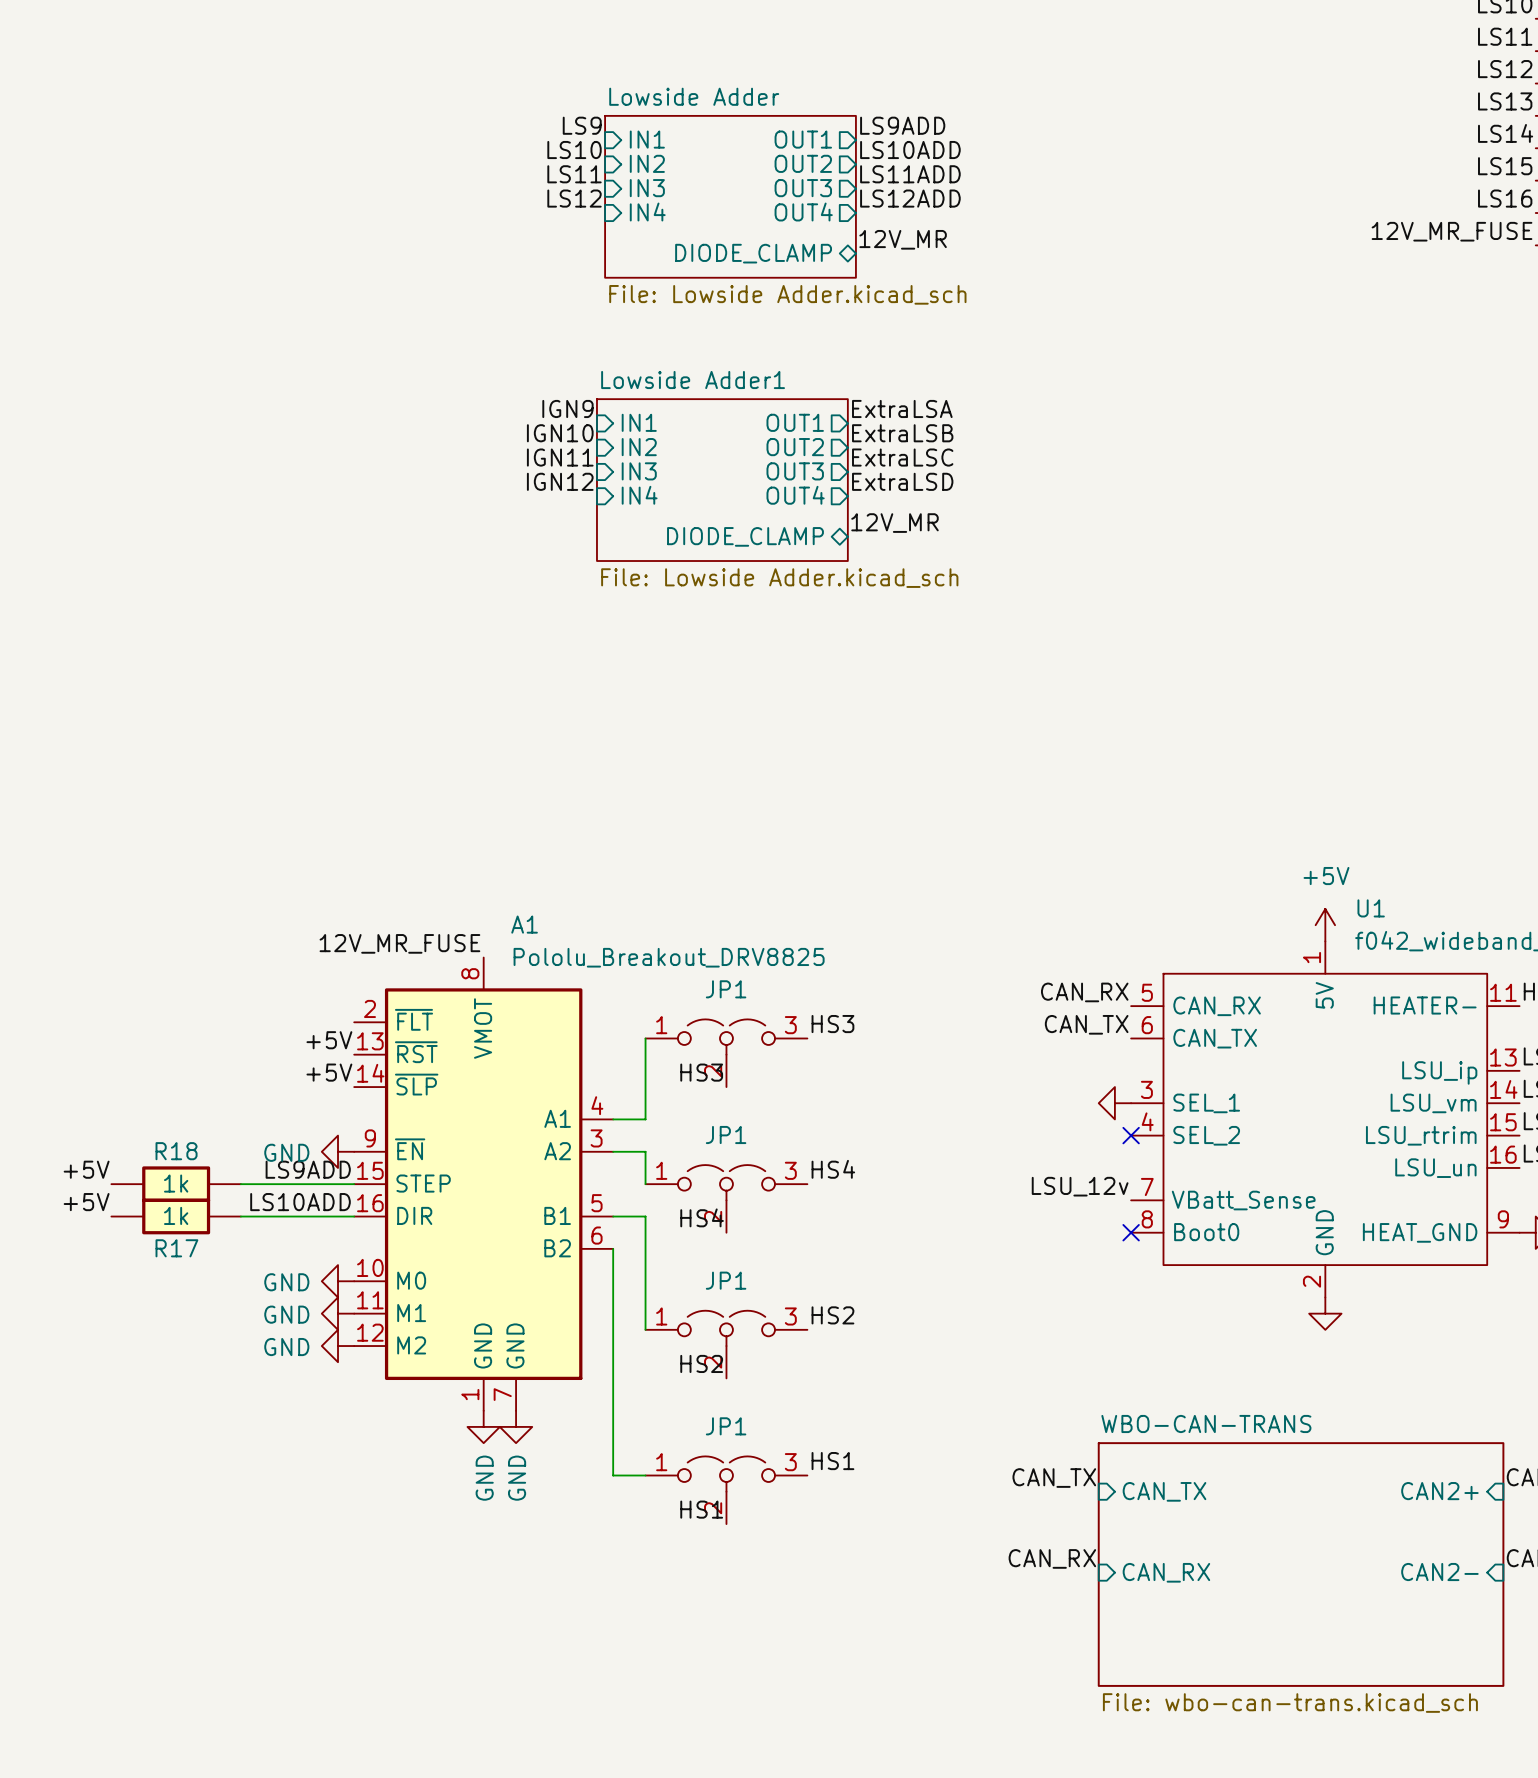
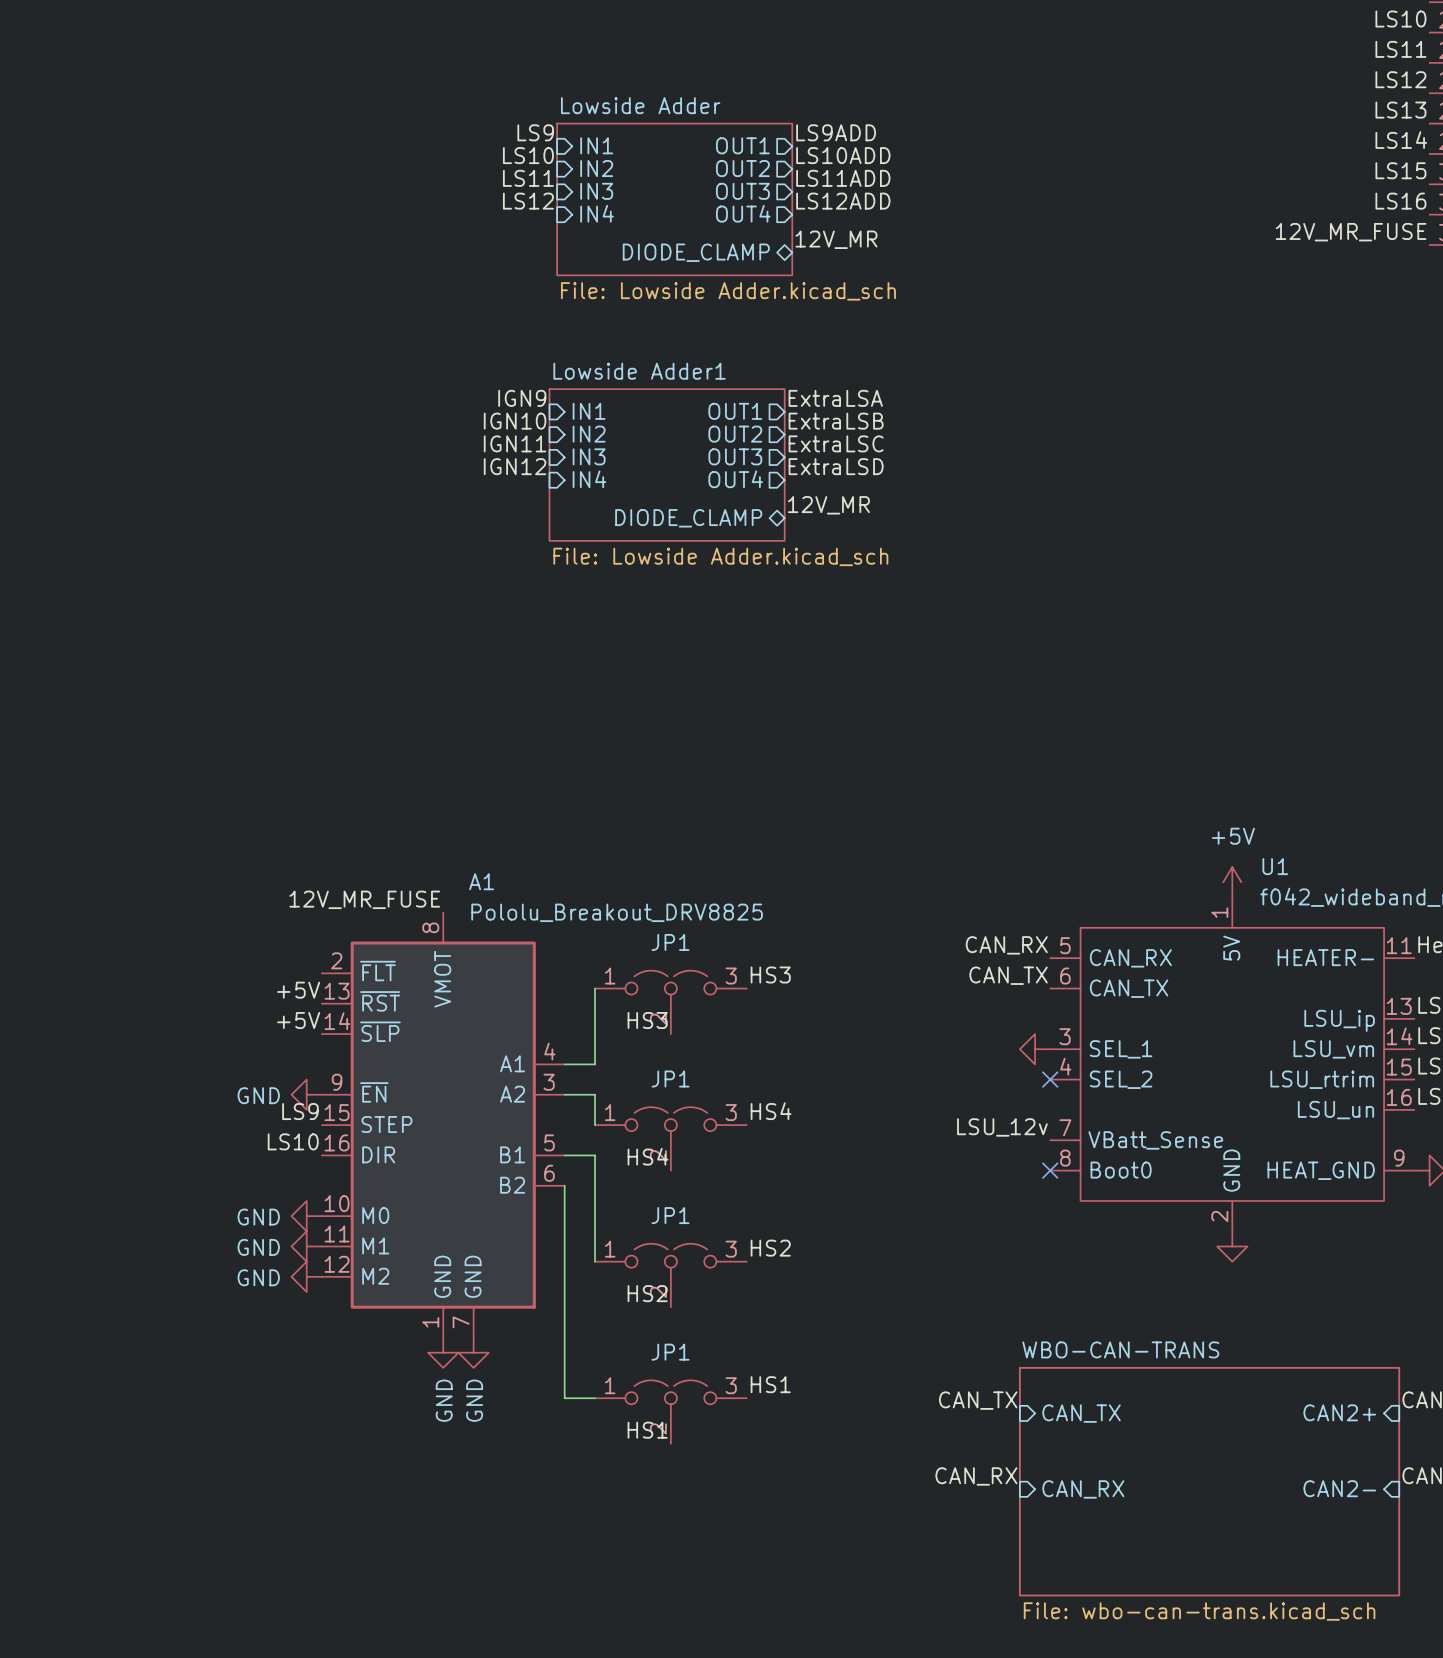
label: +5V (86, 1169) -> none
label: LS9ADD (308, 1169) -> LS9 (300, 1111)
R18: 1k (176, 1184) -> none
wire: (240, 1184) (354, 1184) -> none
label: +5V (86, 1202) -> none
label: LS10ADD (300, 1202) -> LS10 (293, 1141)
R17: 1k (176, 1216) -> none
wire: (240, 1216) (354, 1216) -> none

